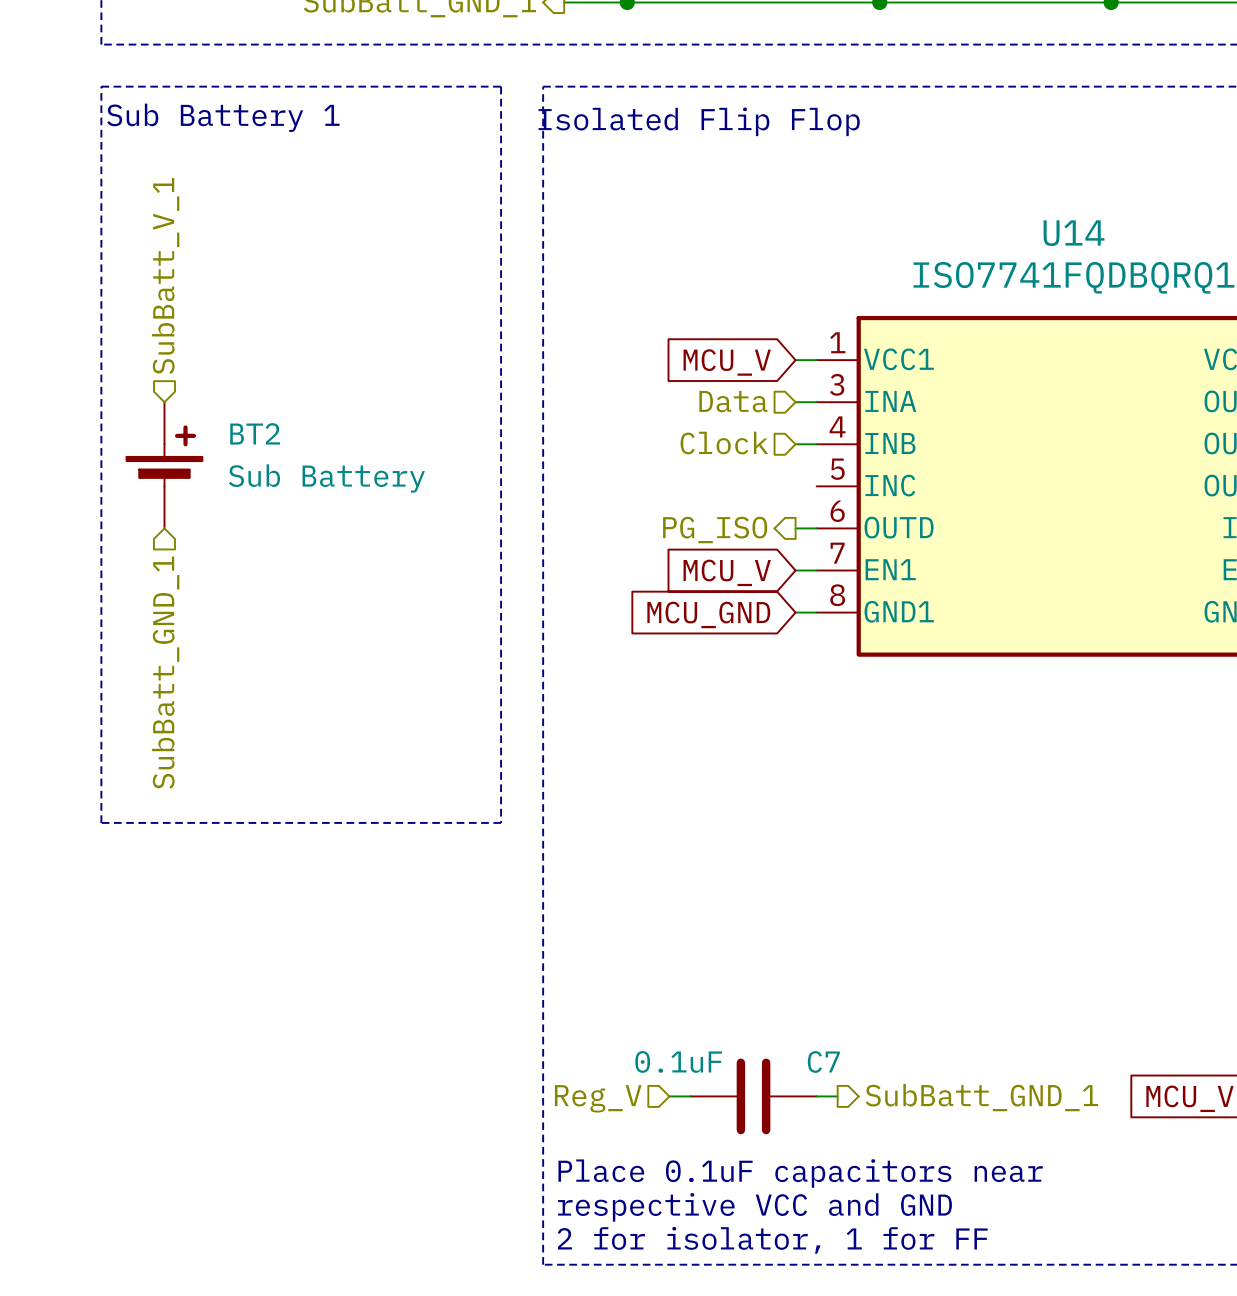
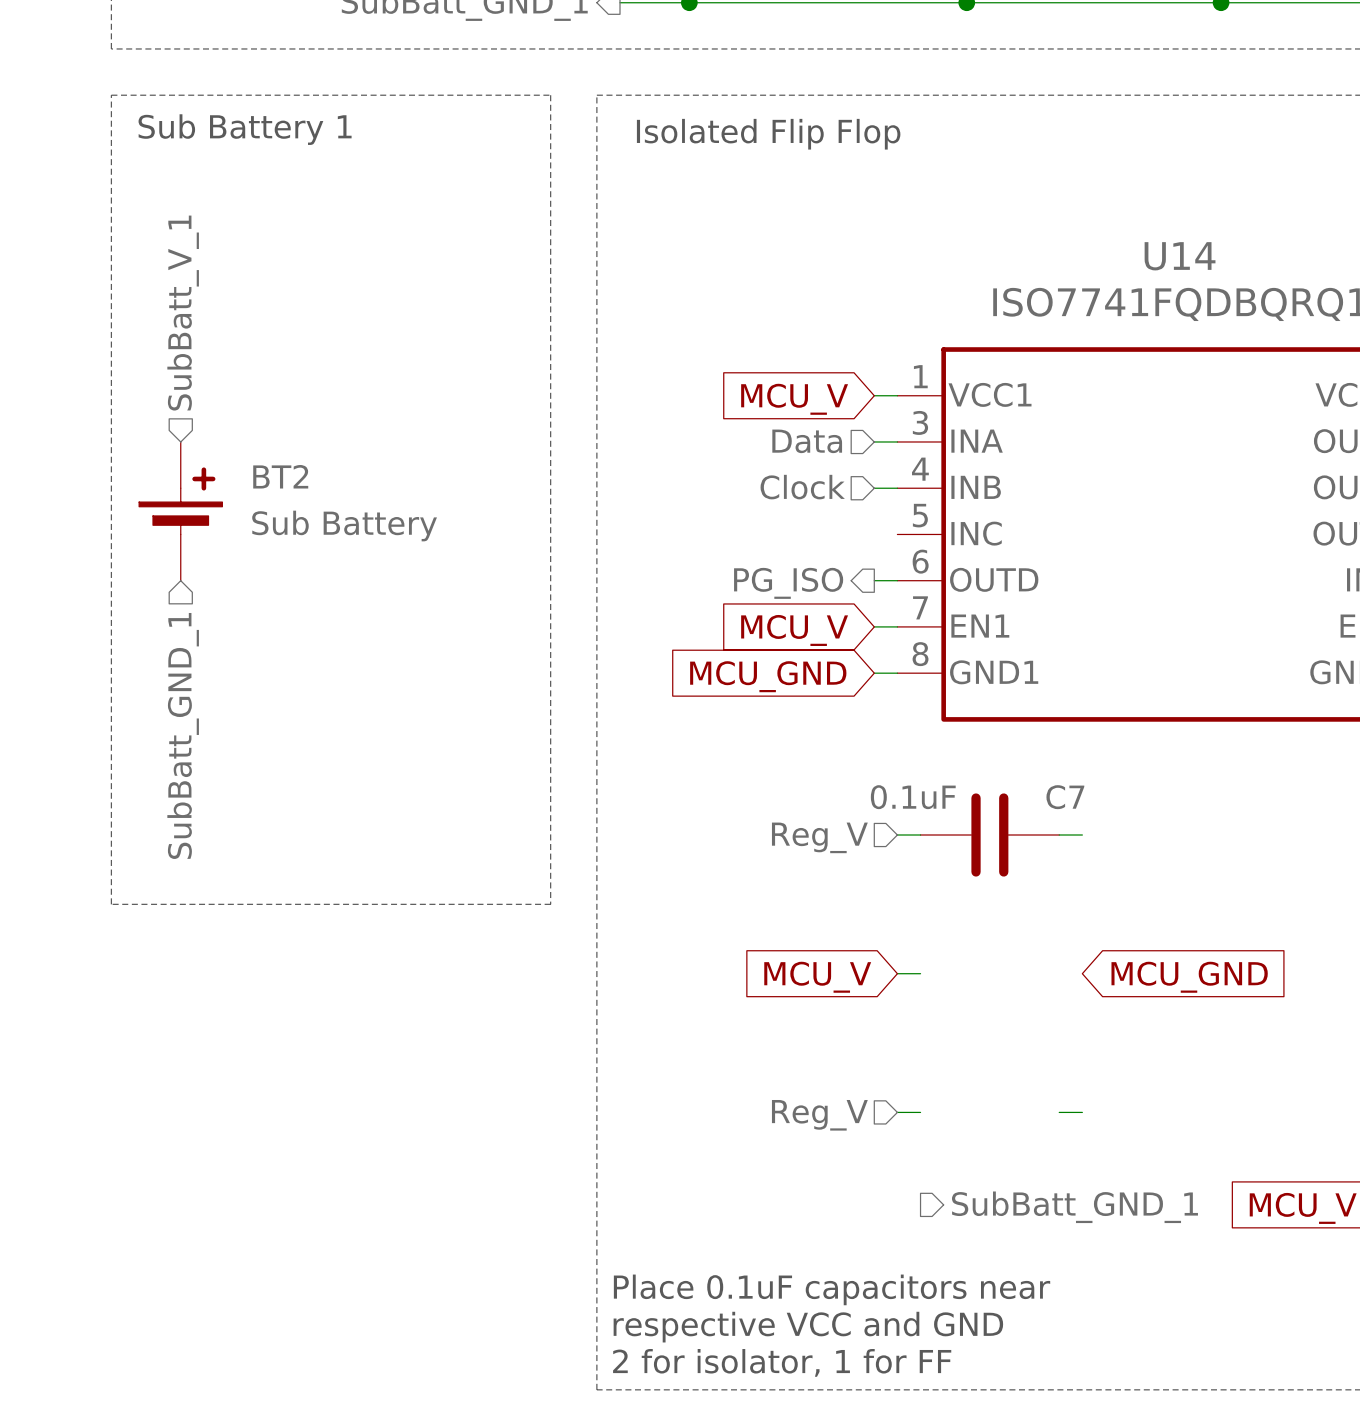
wire: none -> (897, 835) (920, 835)
wire: none -> (1059, 835) (1082, 835)
hierarchical label: none -> Reg_V (819, 837)
wire: none -> (897, 973) (920, 973)
global label: none -> MCU_V (817, 977)
global label: none -> MCU_GND (1189, 977)
wire: (669, 1096) (690, 1096) -> (897, 1112) (920, 1112)
C7 position: (753, 1096) -> (989, 835)
wire: (816, 1096) (837, 1096) -> (1059, 1112) (1082, 1112)
hierarchical label position: Reg_V (598, 1098) -> Reg_V (819, 1115)

